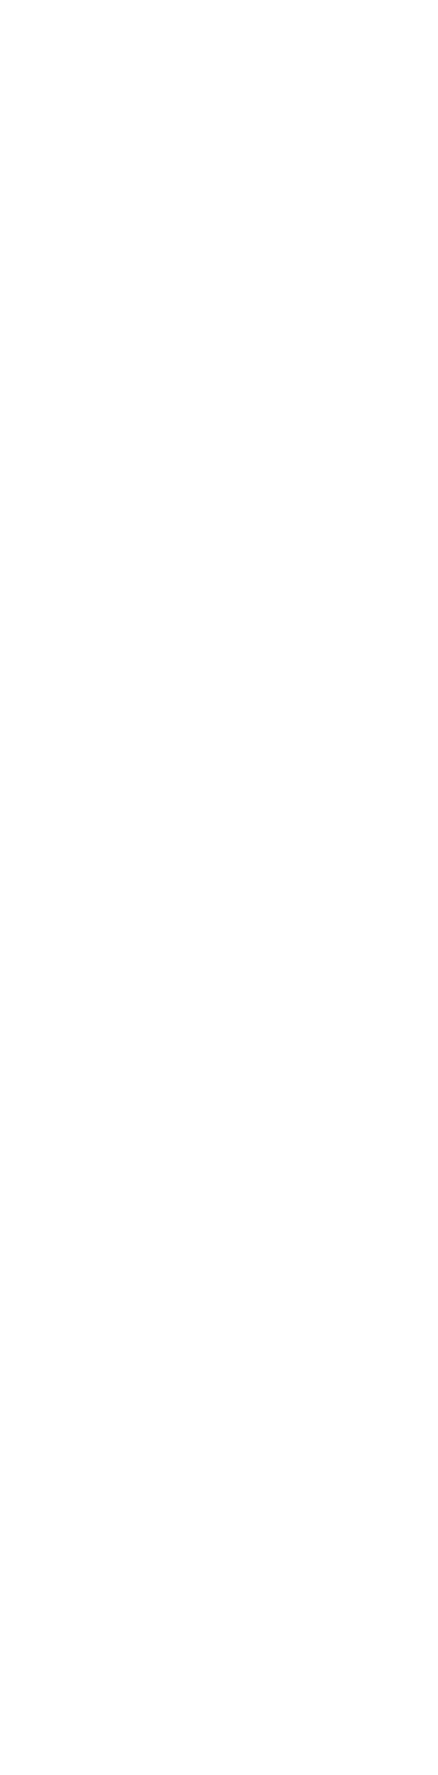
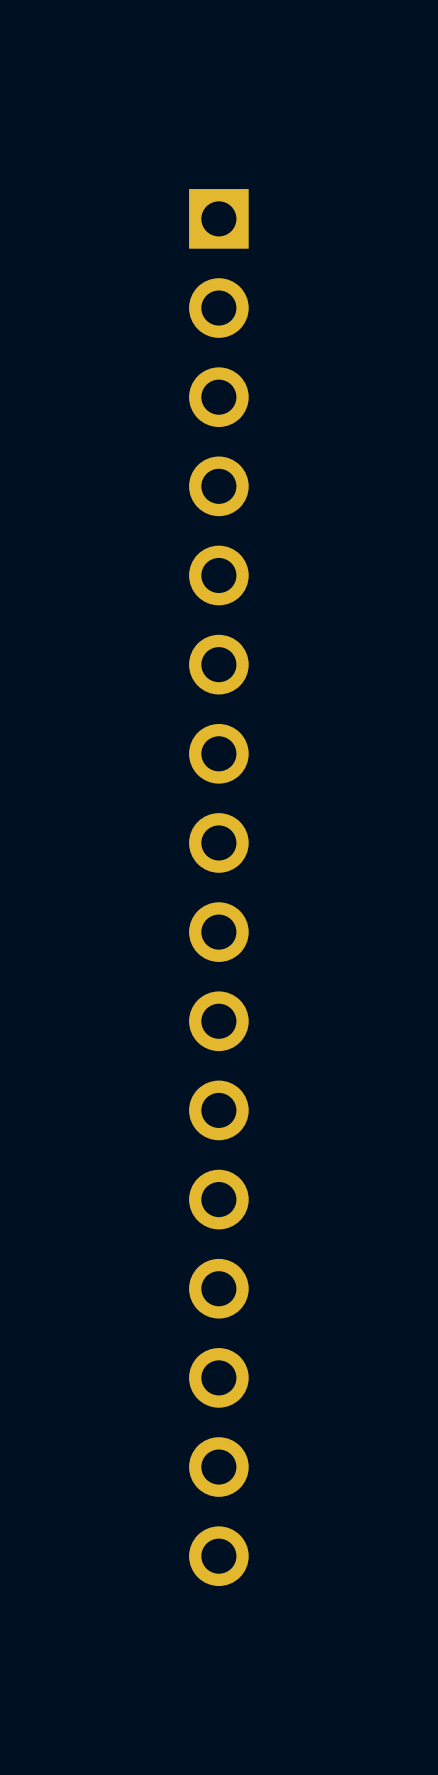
part: none -> (218, 887)

